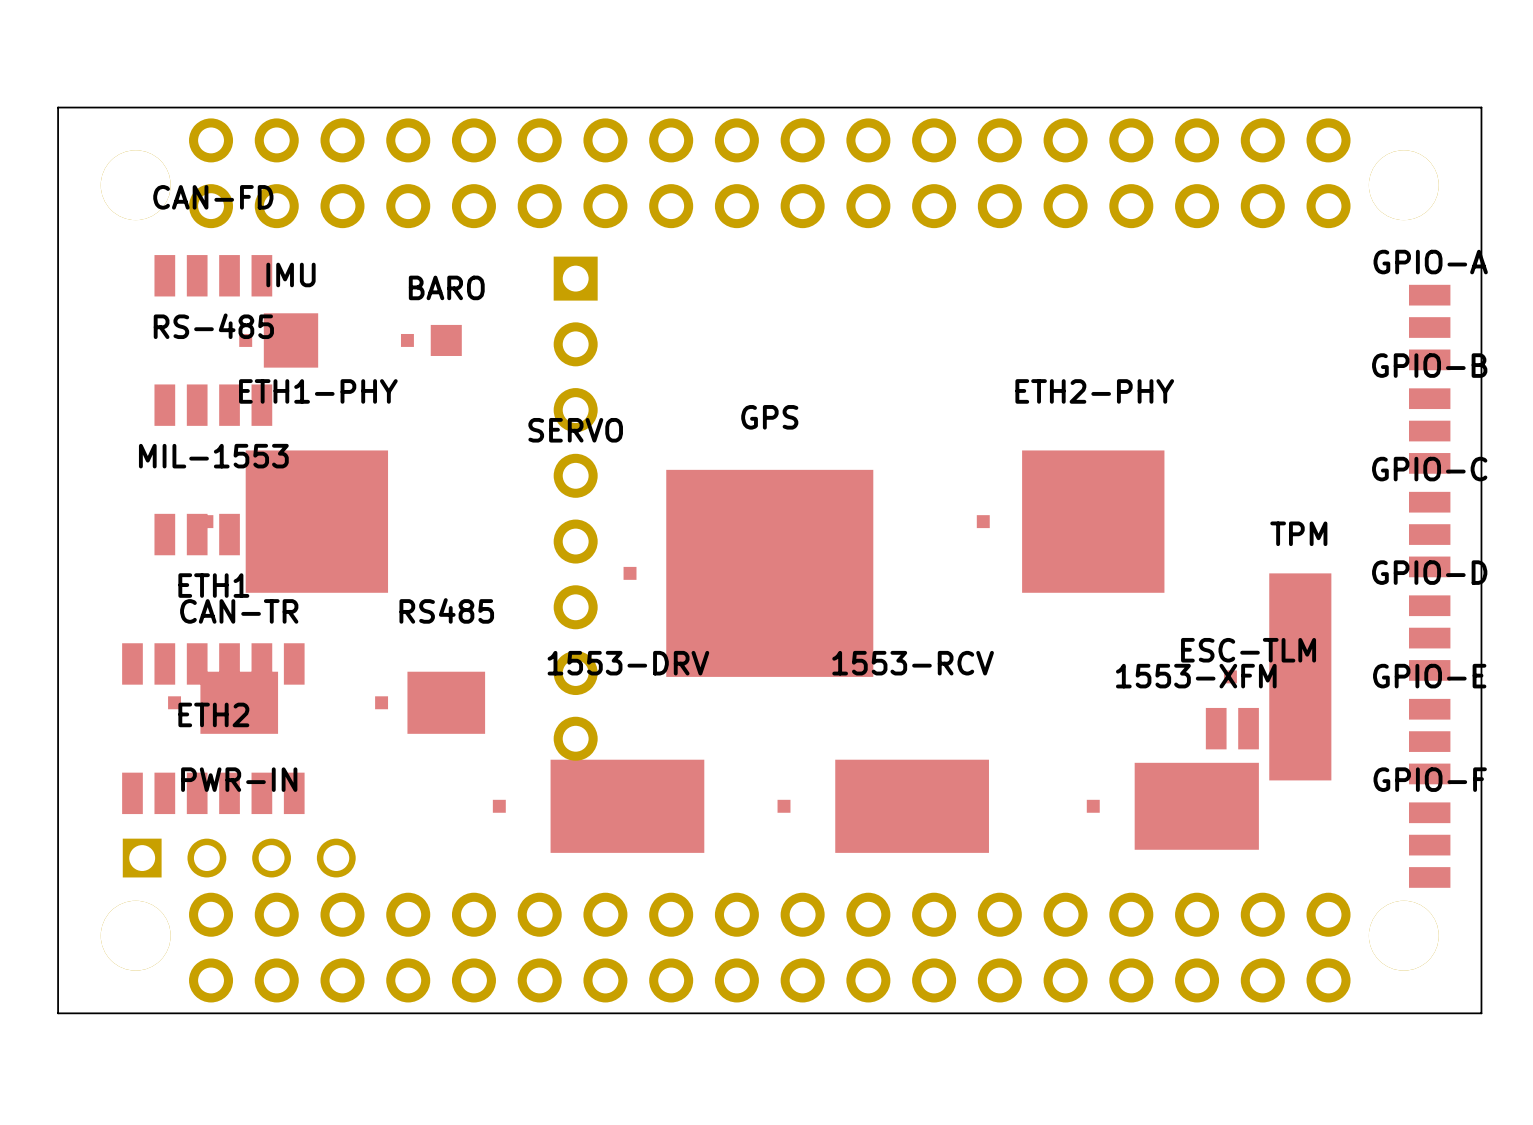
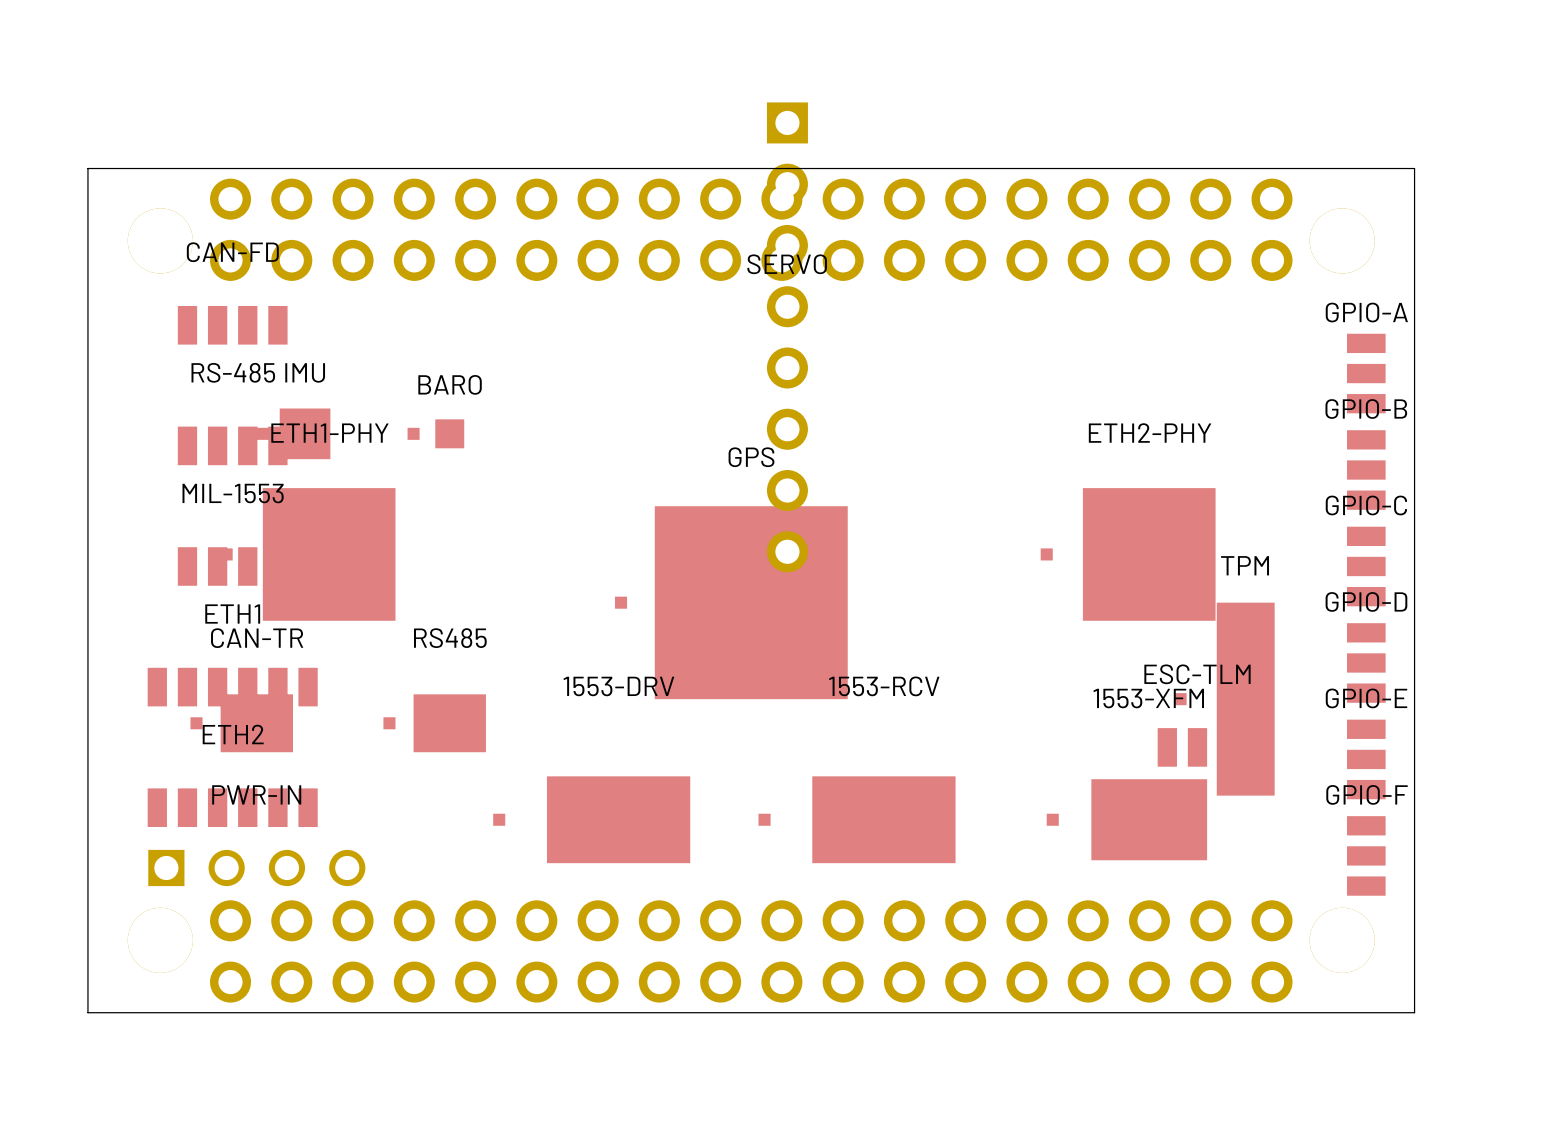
IMU position: (278, 340) -> (293, 433)
BARO position: (431, 340) -> (435, 433)
SERVO position: (575, 508) -> (787, 337)
ETH2-PHY position: (1070, 521) -> (1128, 554)

